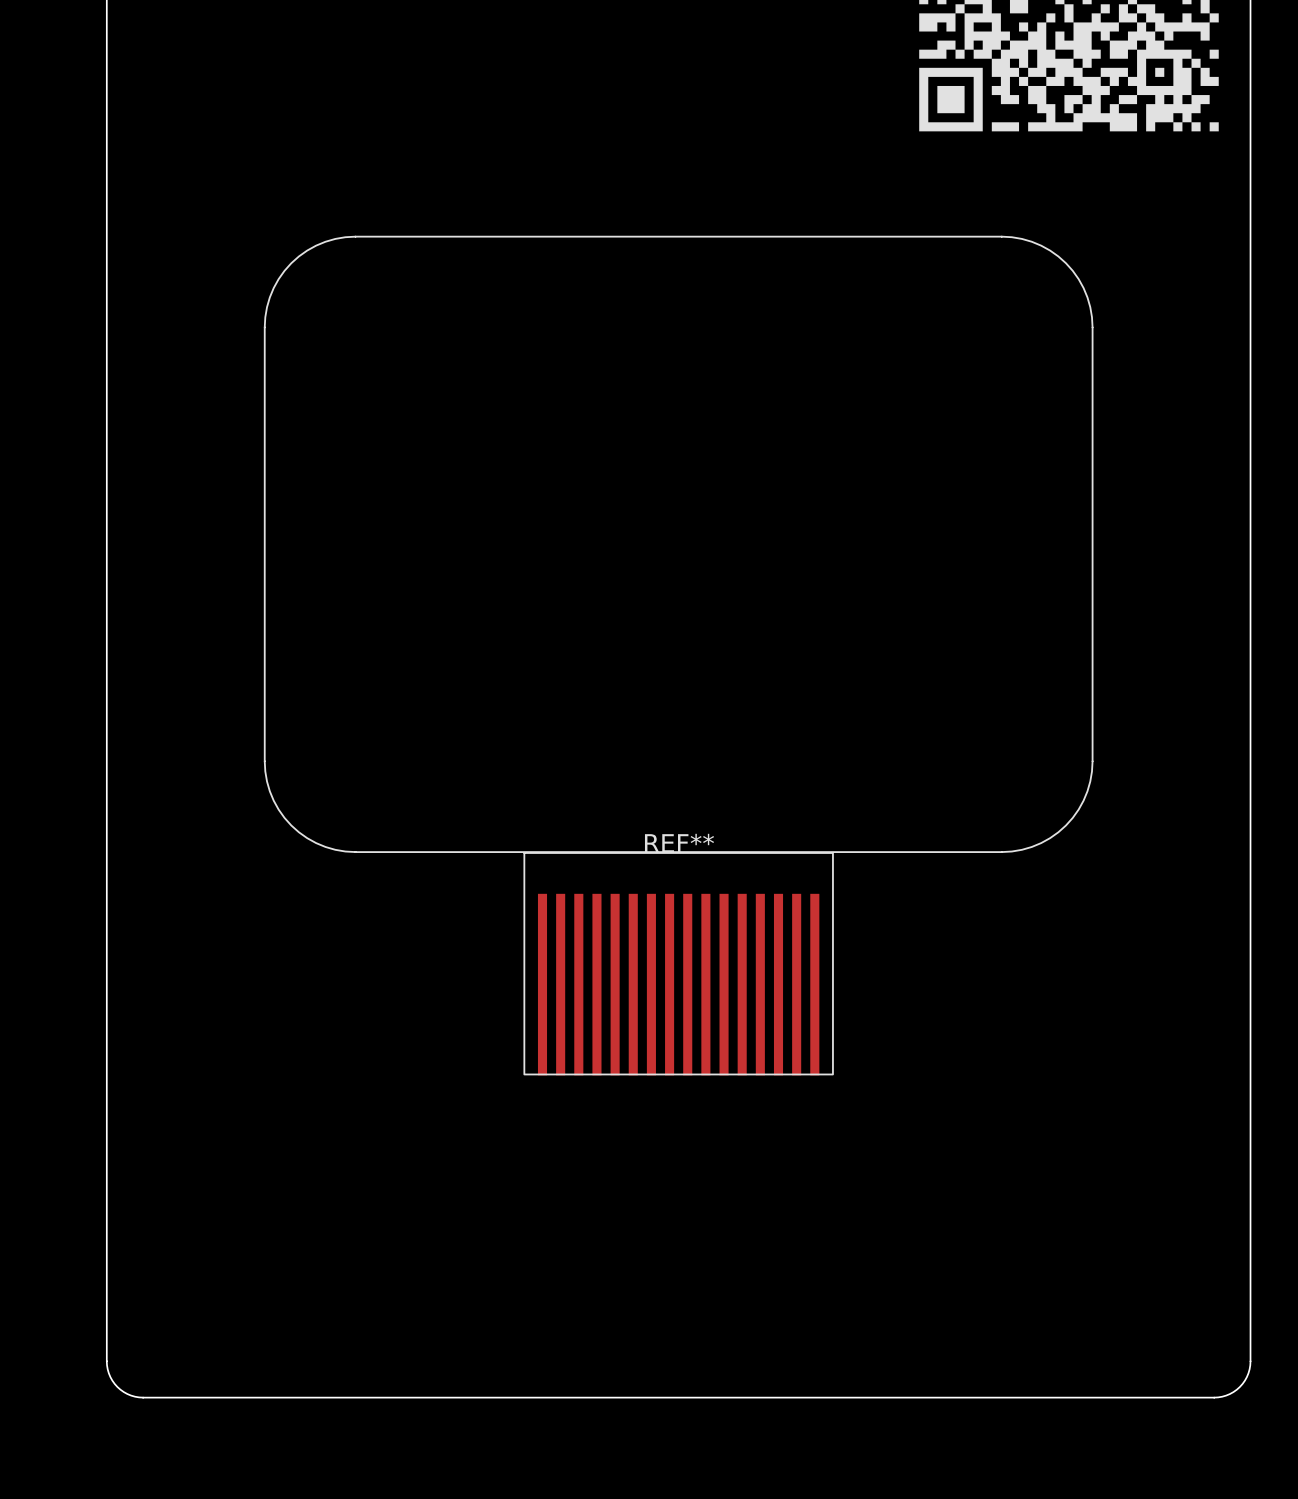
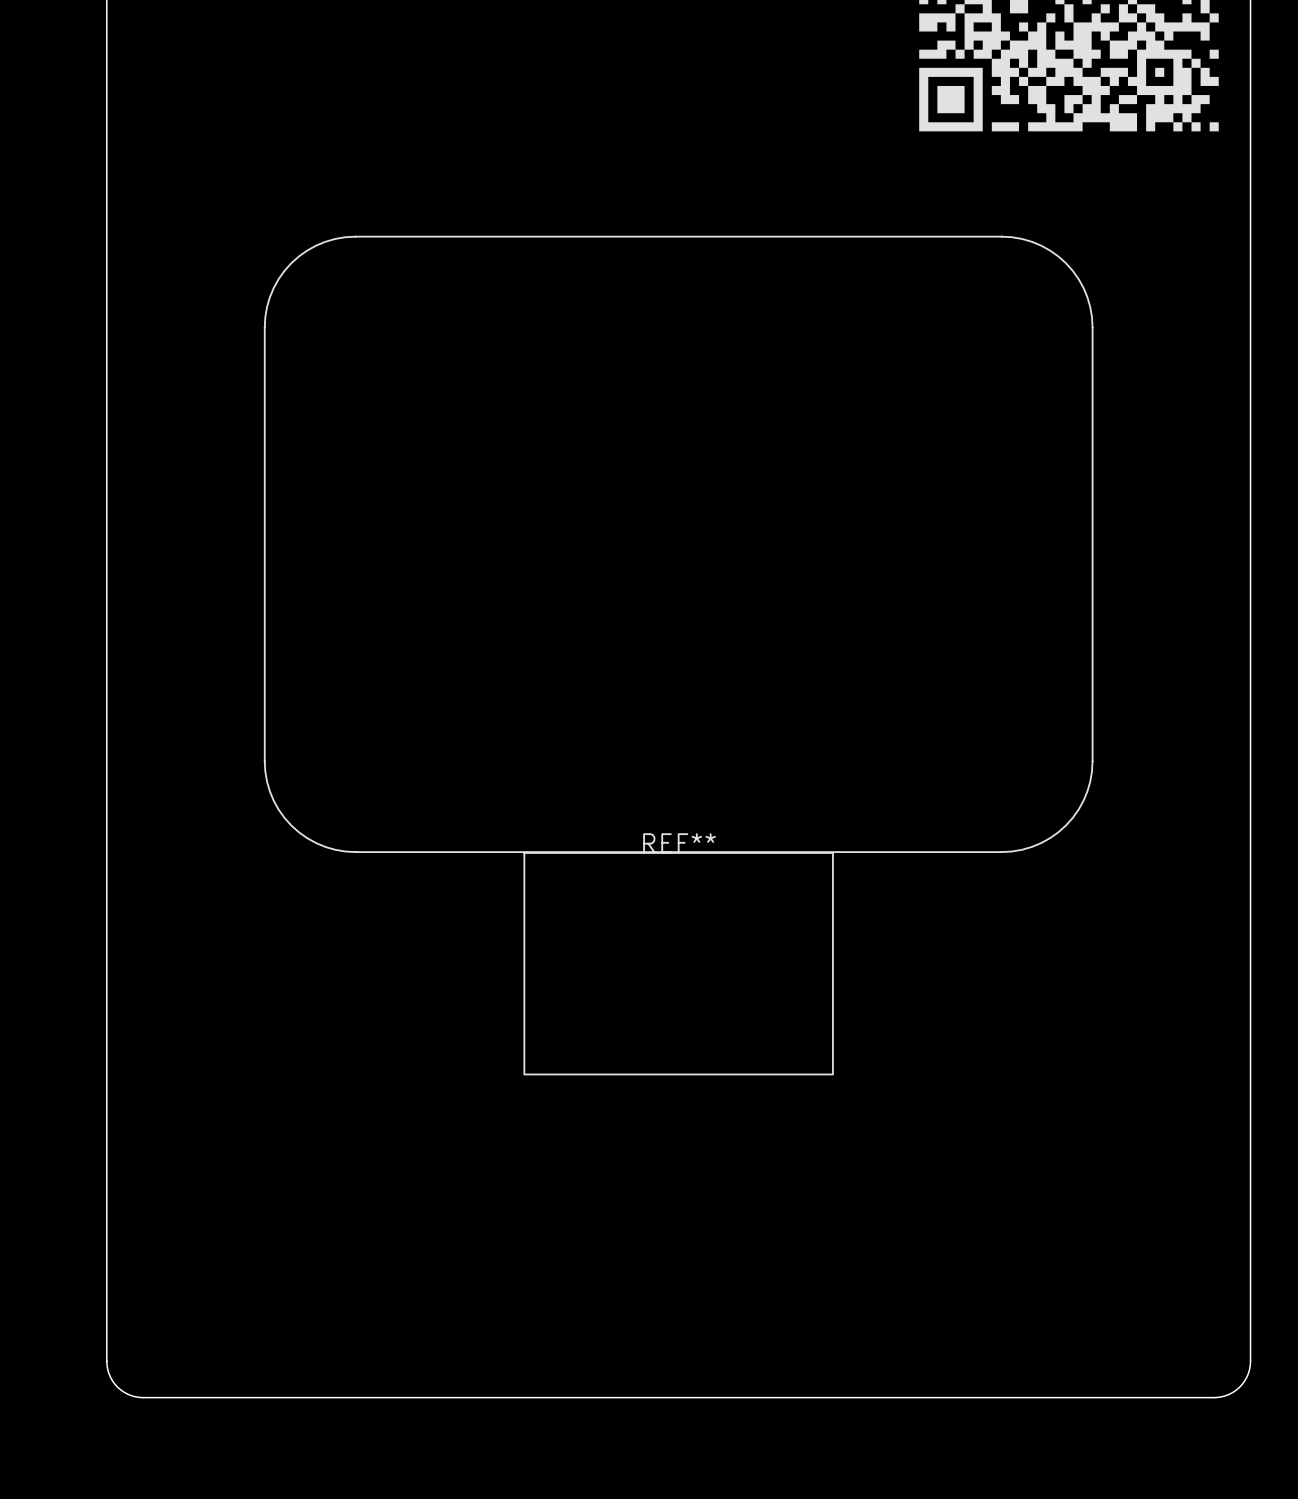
REF** footprint: [263, 235, 1094, 1076] -> [263, 235, 1094, 1076]

